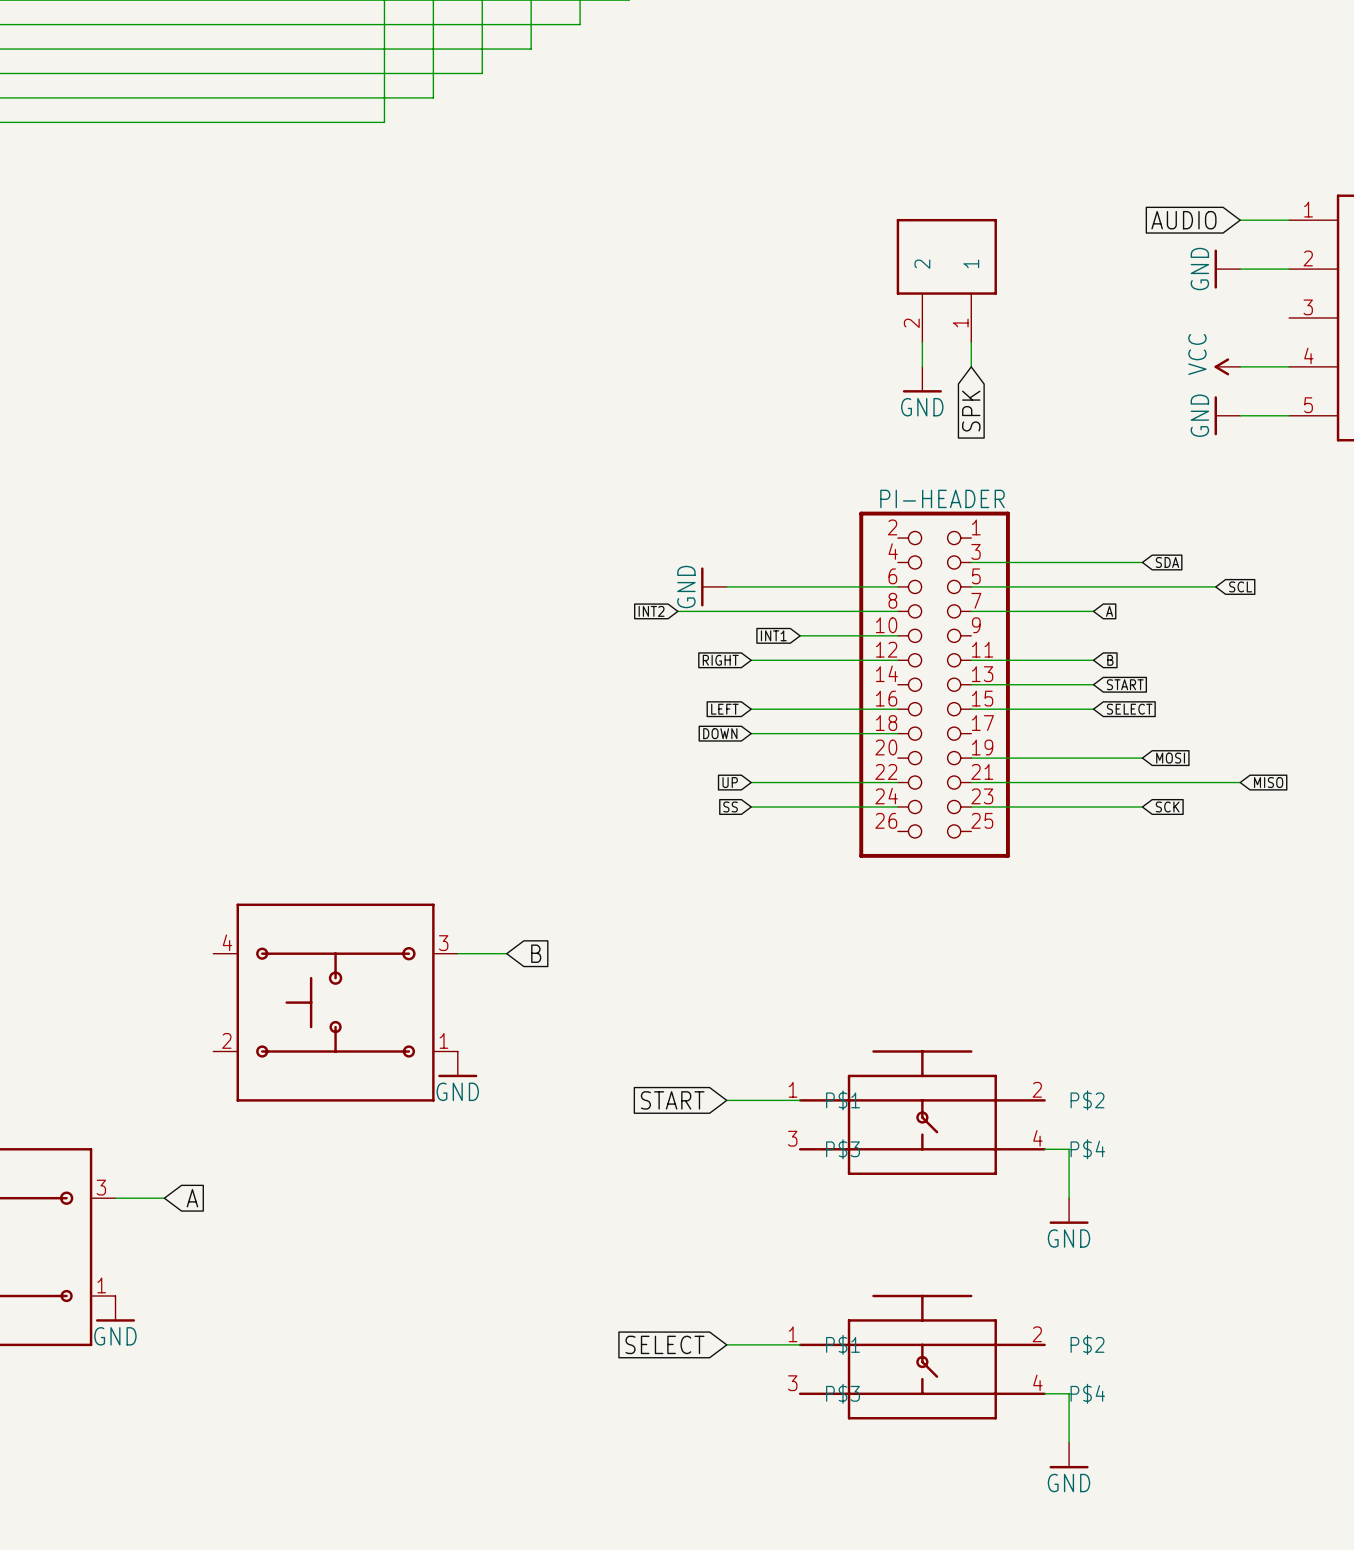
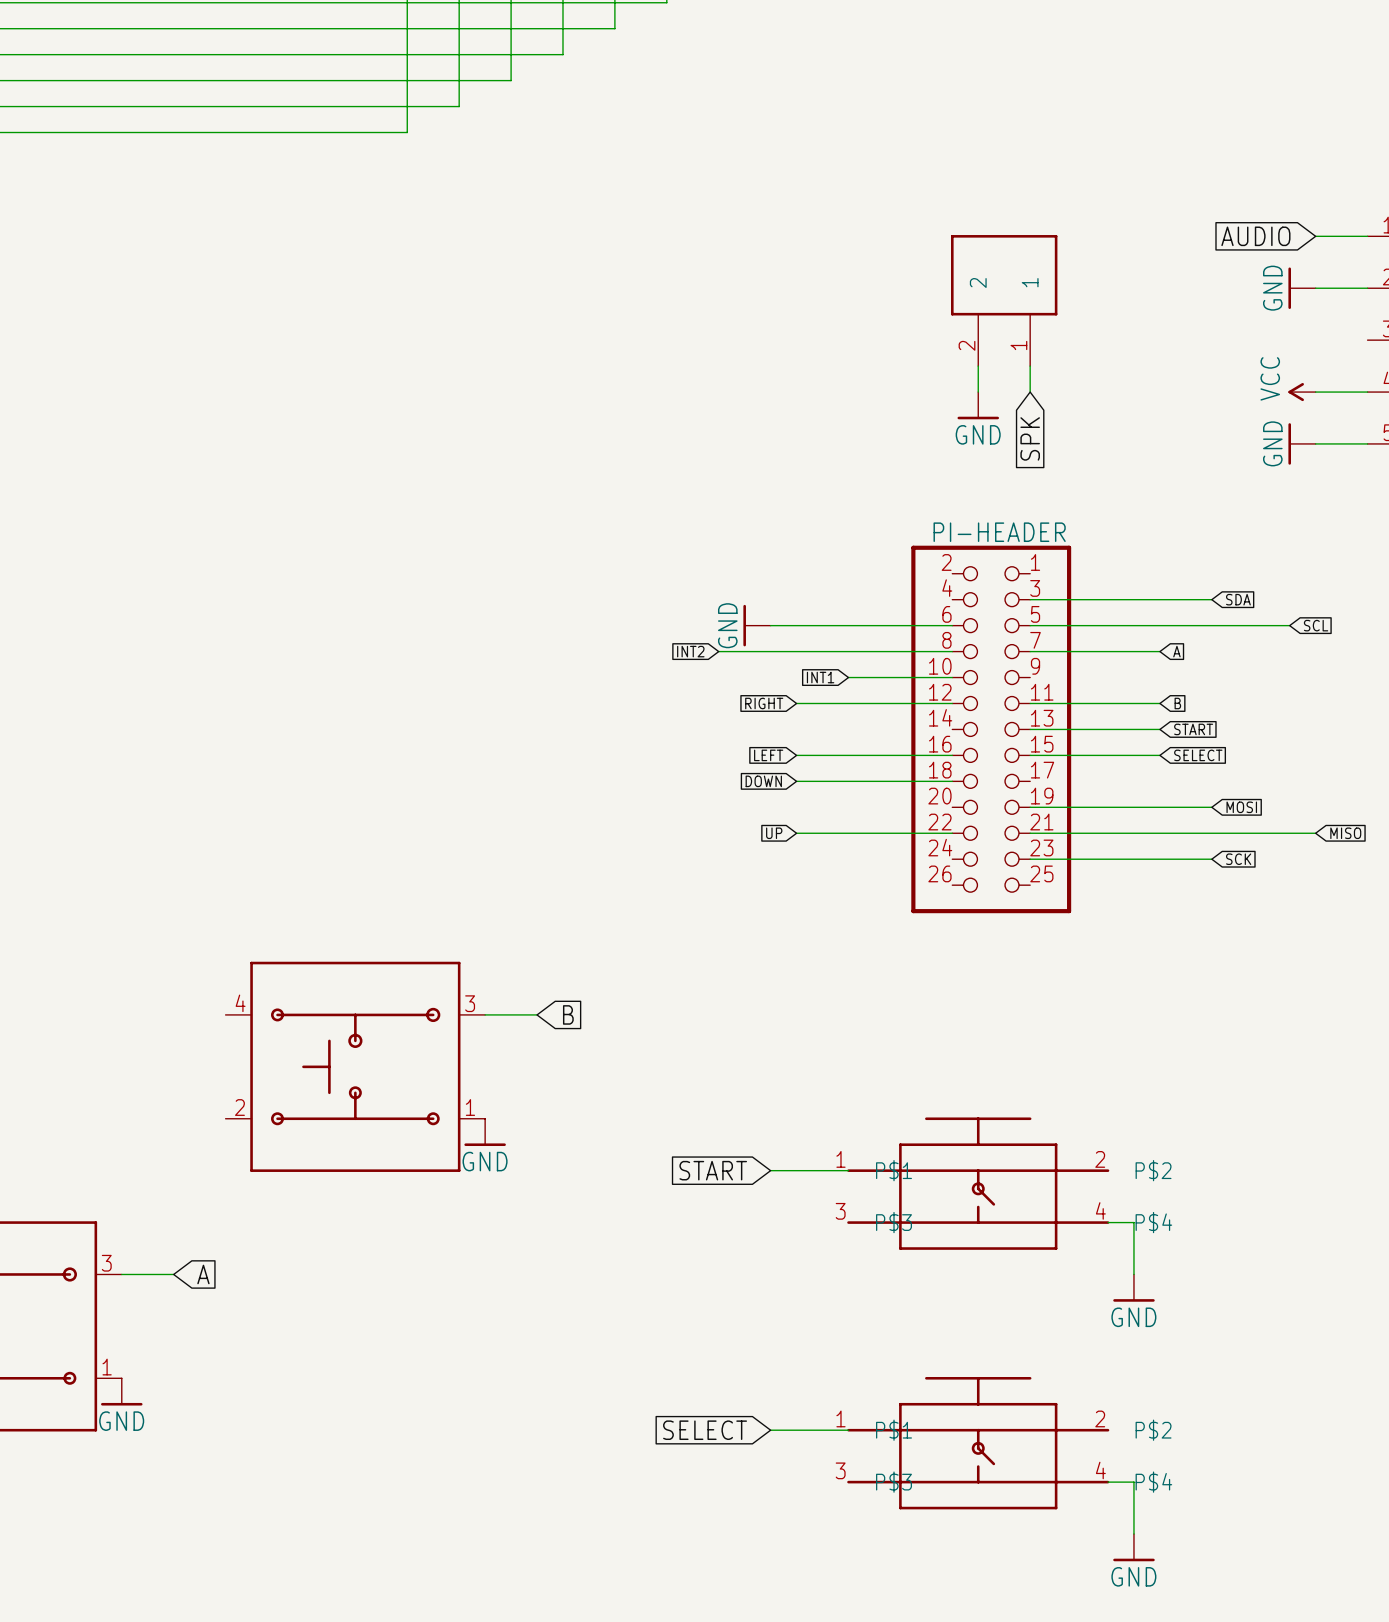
global label: SS (730, 806) -> none
wire: (751, 806) (897, 806) -> none

